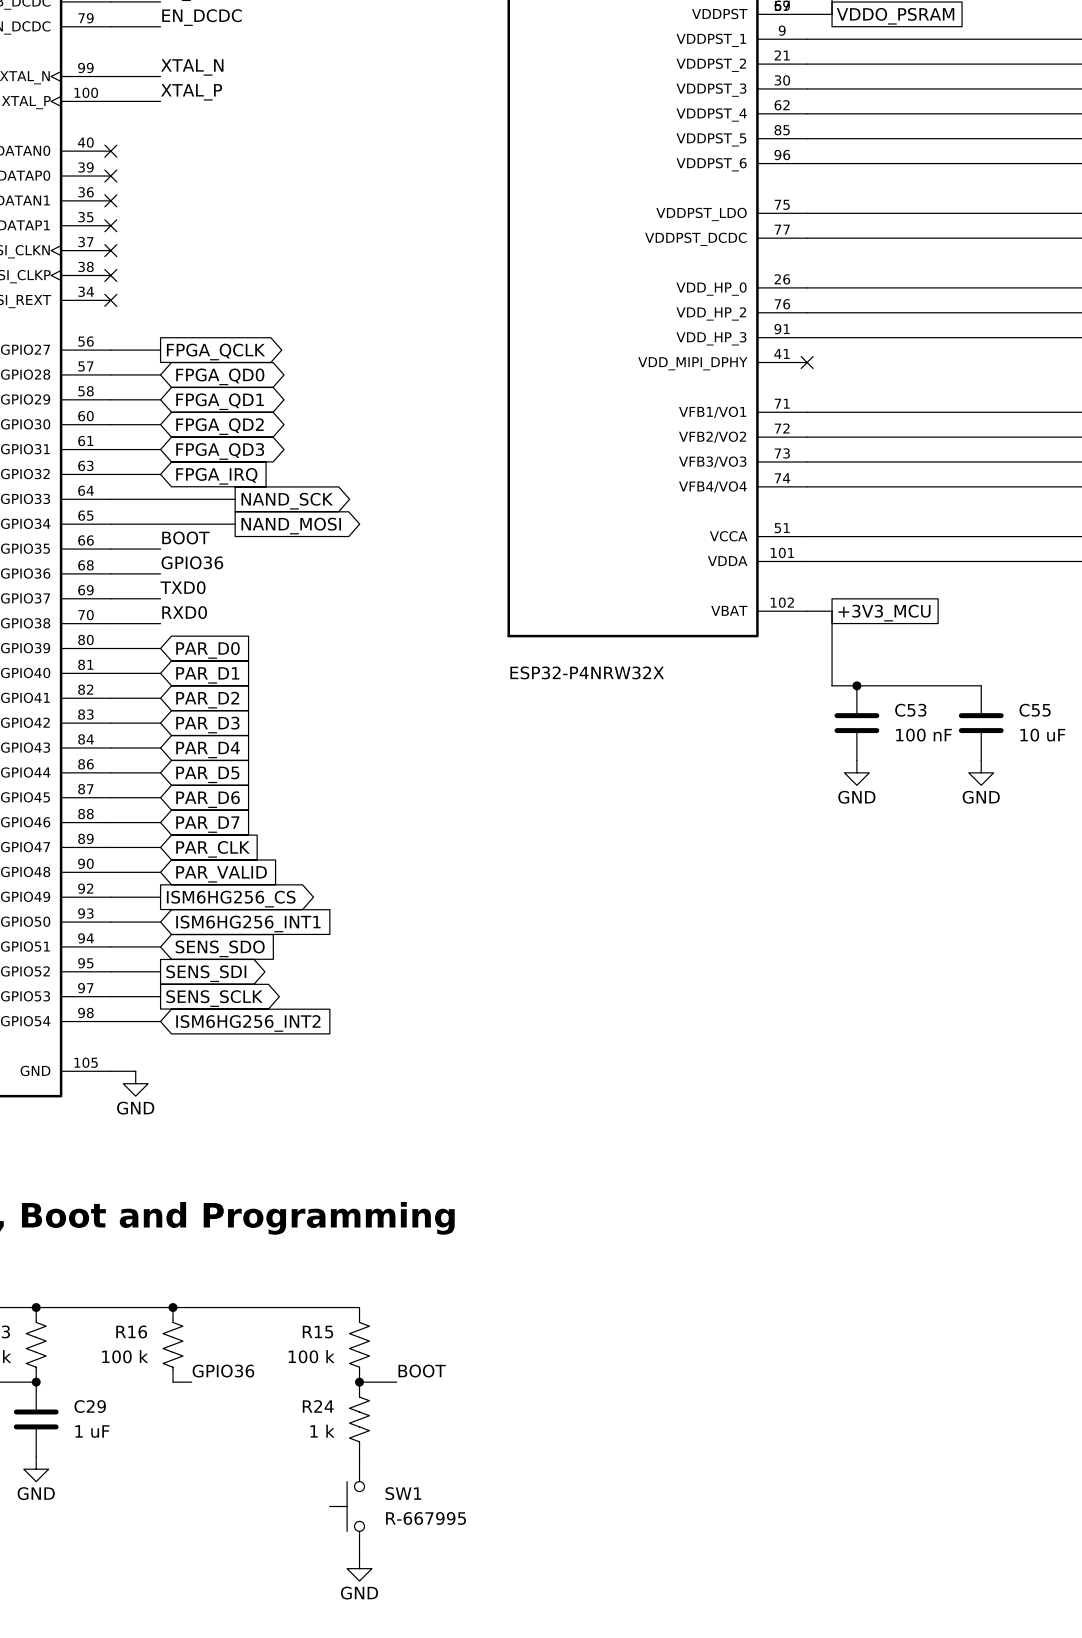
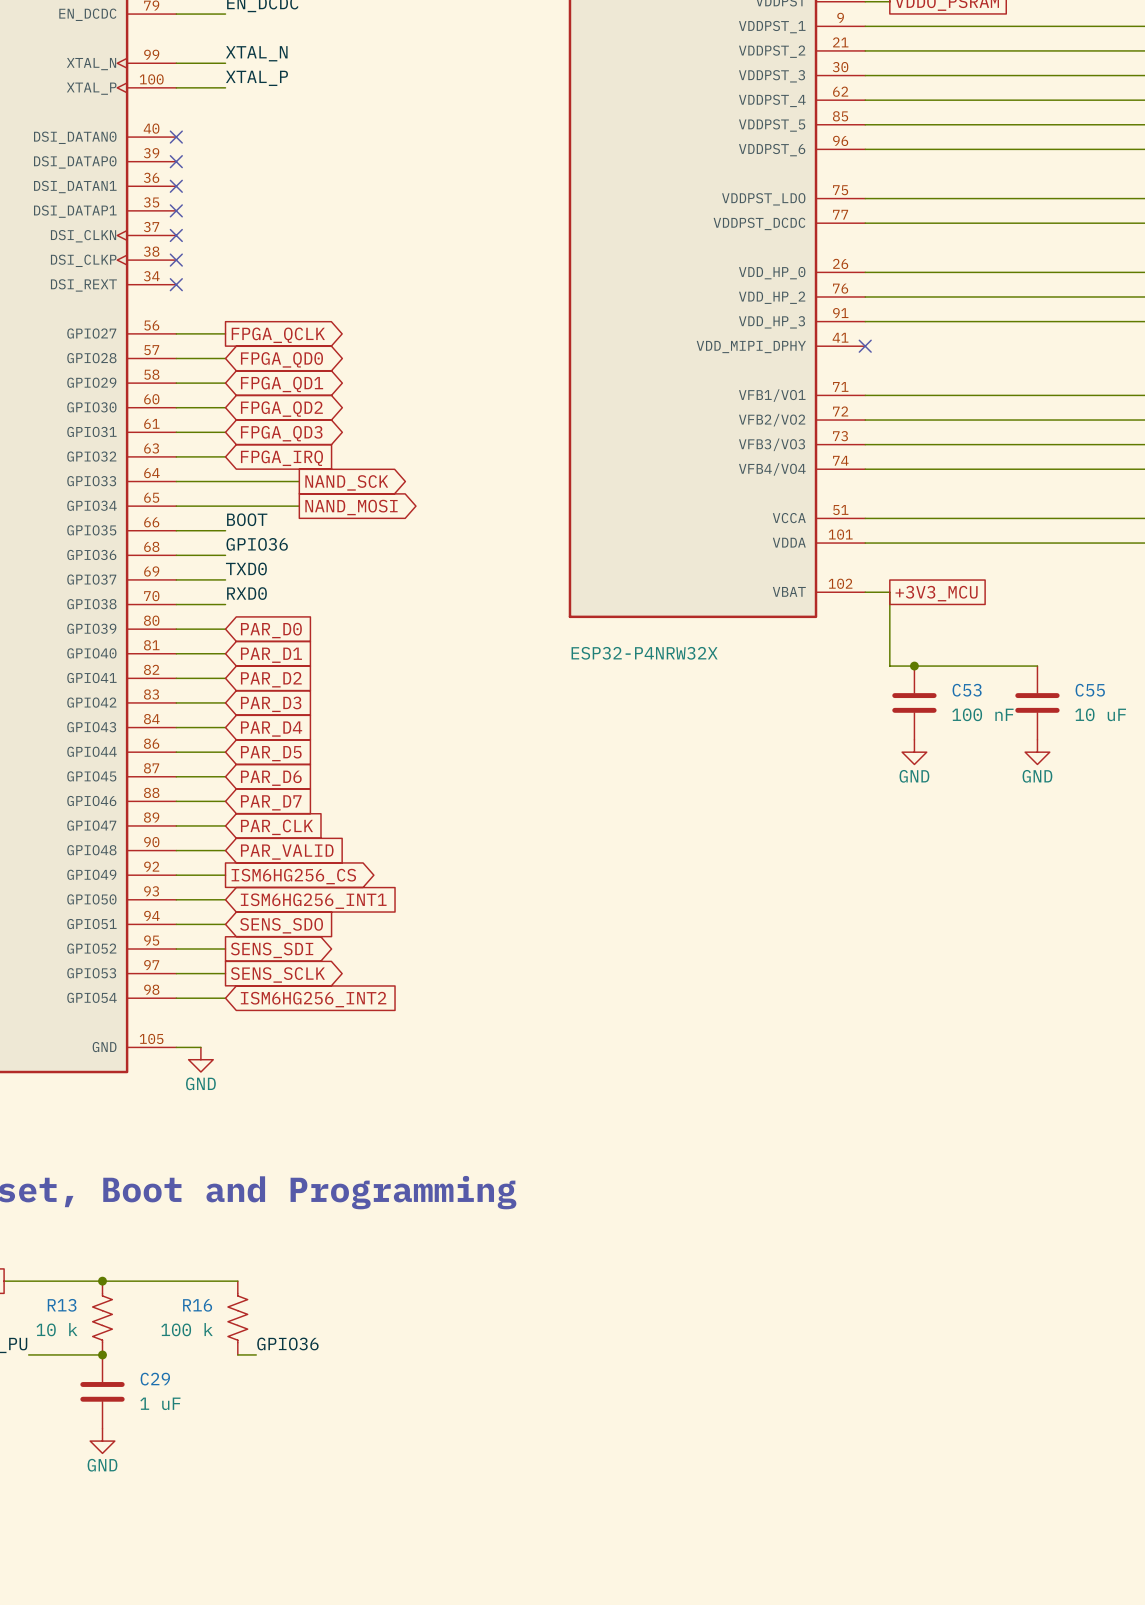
wire: (173, 1307) (359, 1307) -> none
junction: (173, 1307) -> none
R15: 100 k (359, 1344) -> none
label: BOOT (422, 1371) -> none
wire: (359, 1382) (396, 1382) -> none
junction: (359, 1382) -> none
R24: 1 k (359, 1419) -> none
SW1: R-667995 (347, 1506) -> none
power symbol: GND (359, 1568) -> none

